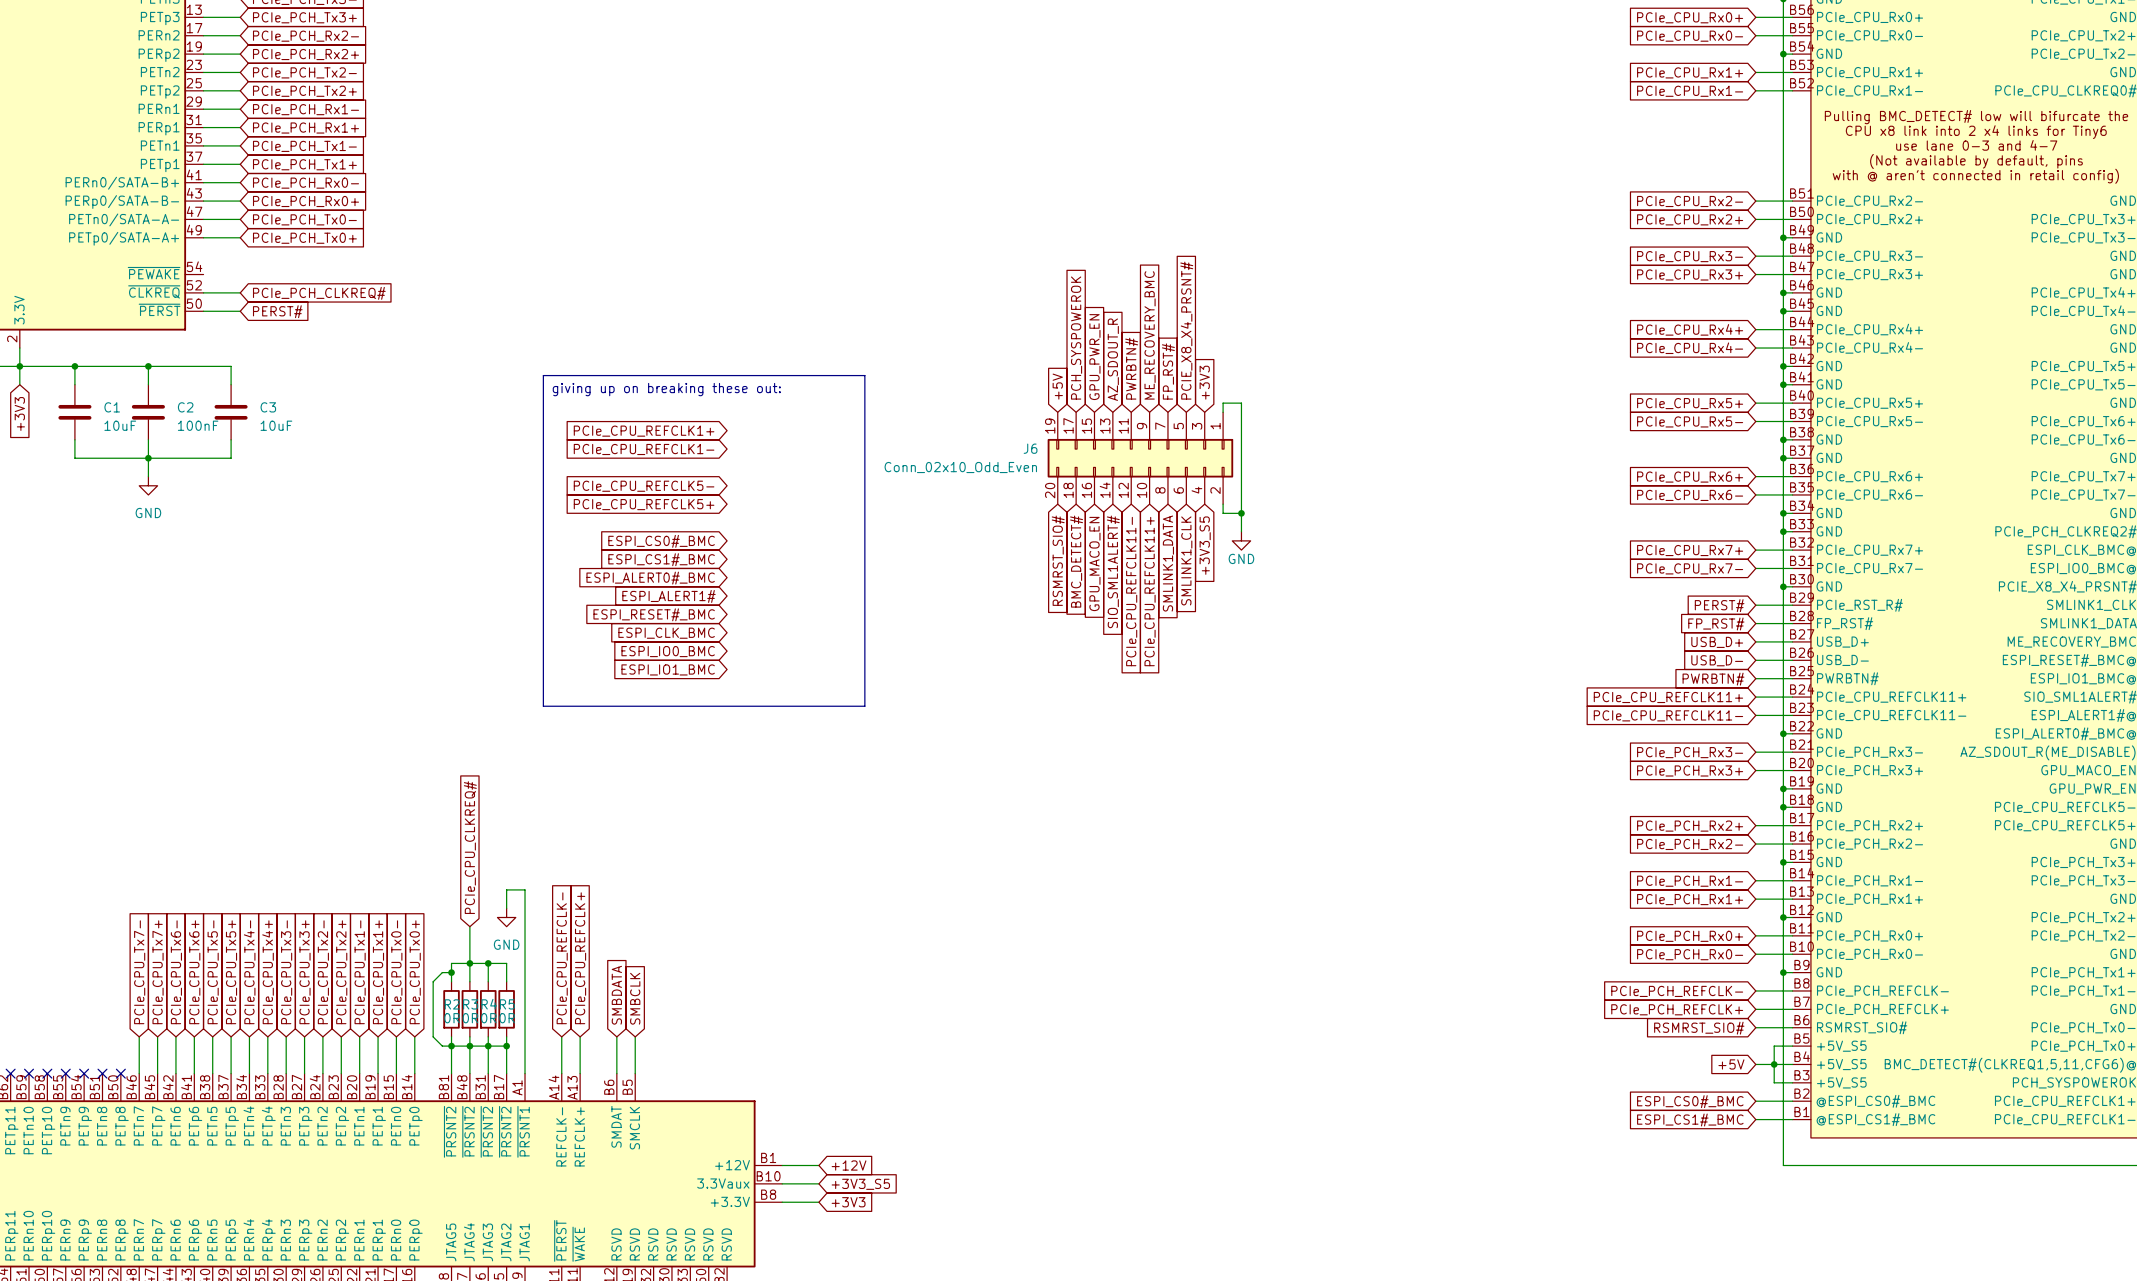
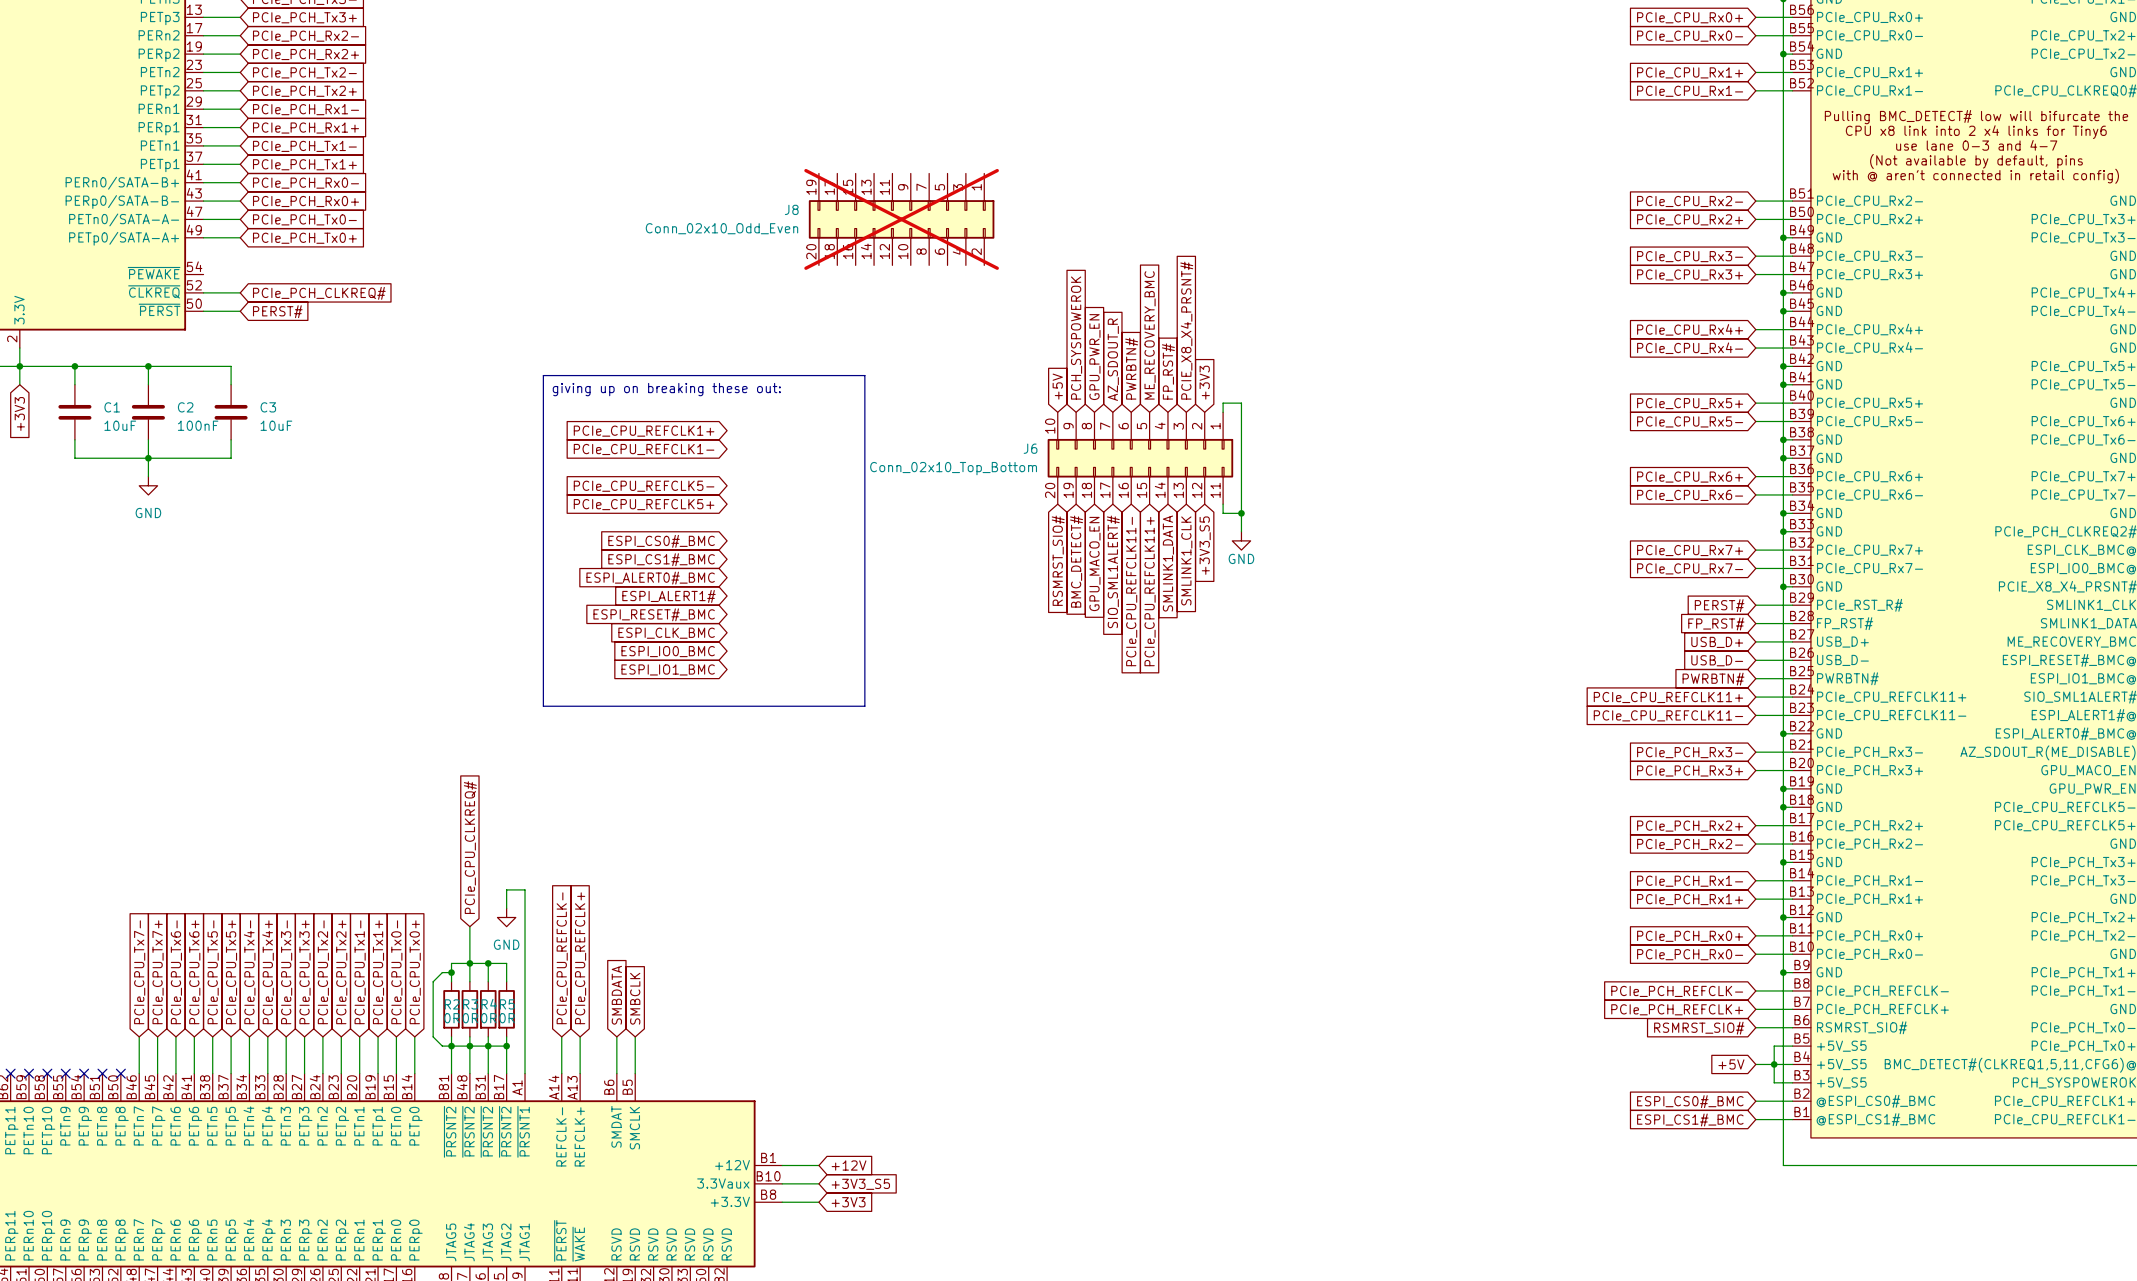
J8: none -> Conn_02x10_Odd_Even (901, 219)
J6 symbol: [1047, 412, 1234, 505] -> [1047, 412, 1234, 505]
J6 value: Conn_02x10_Odd_Even (960, 467) -> Conn_02x10_Top_Bottom (953, 468)

